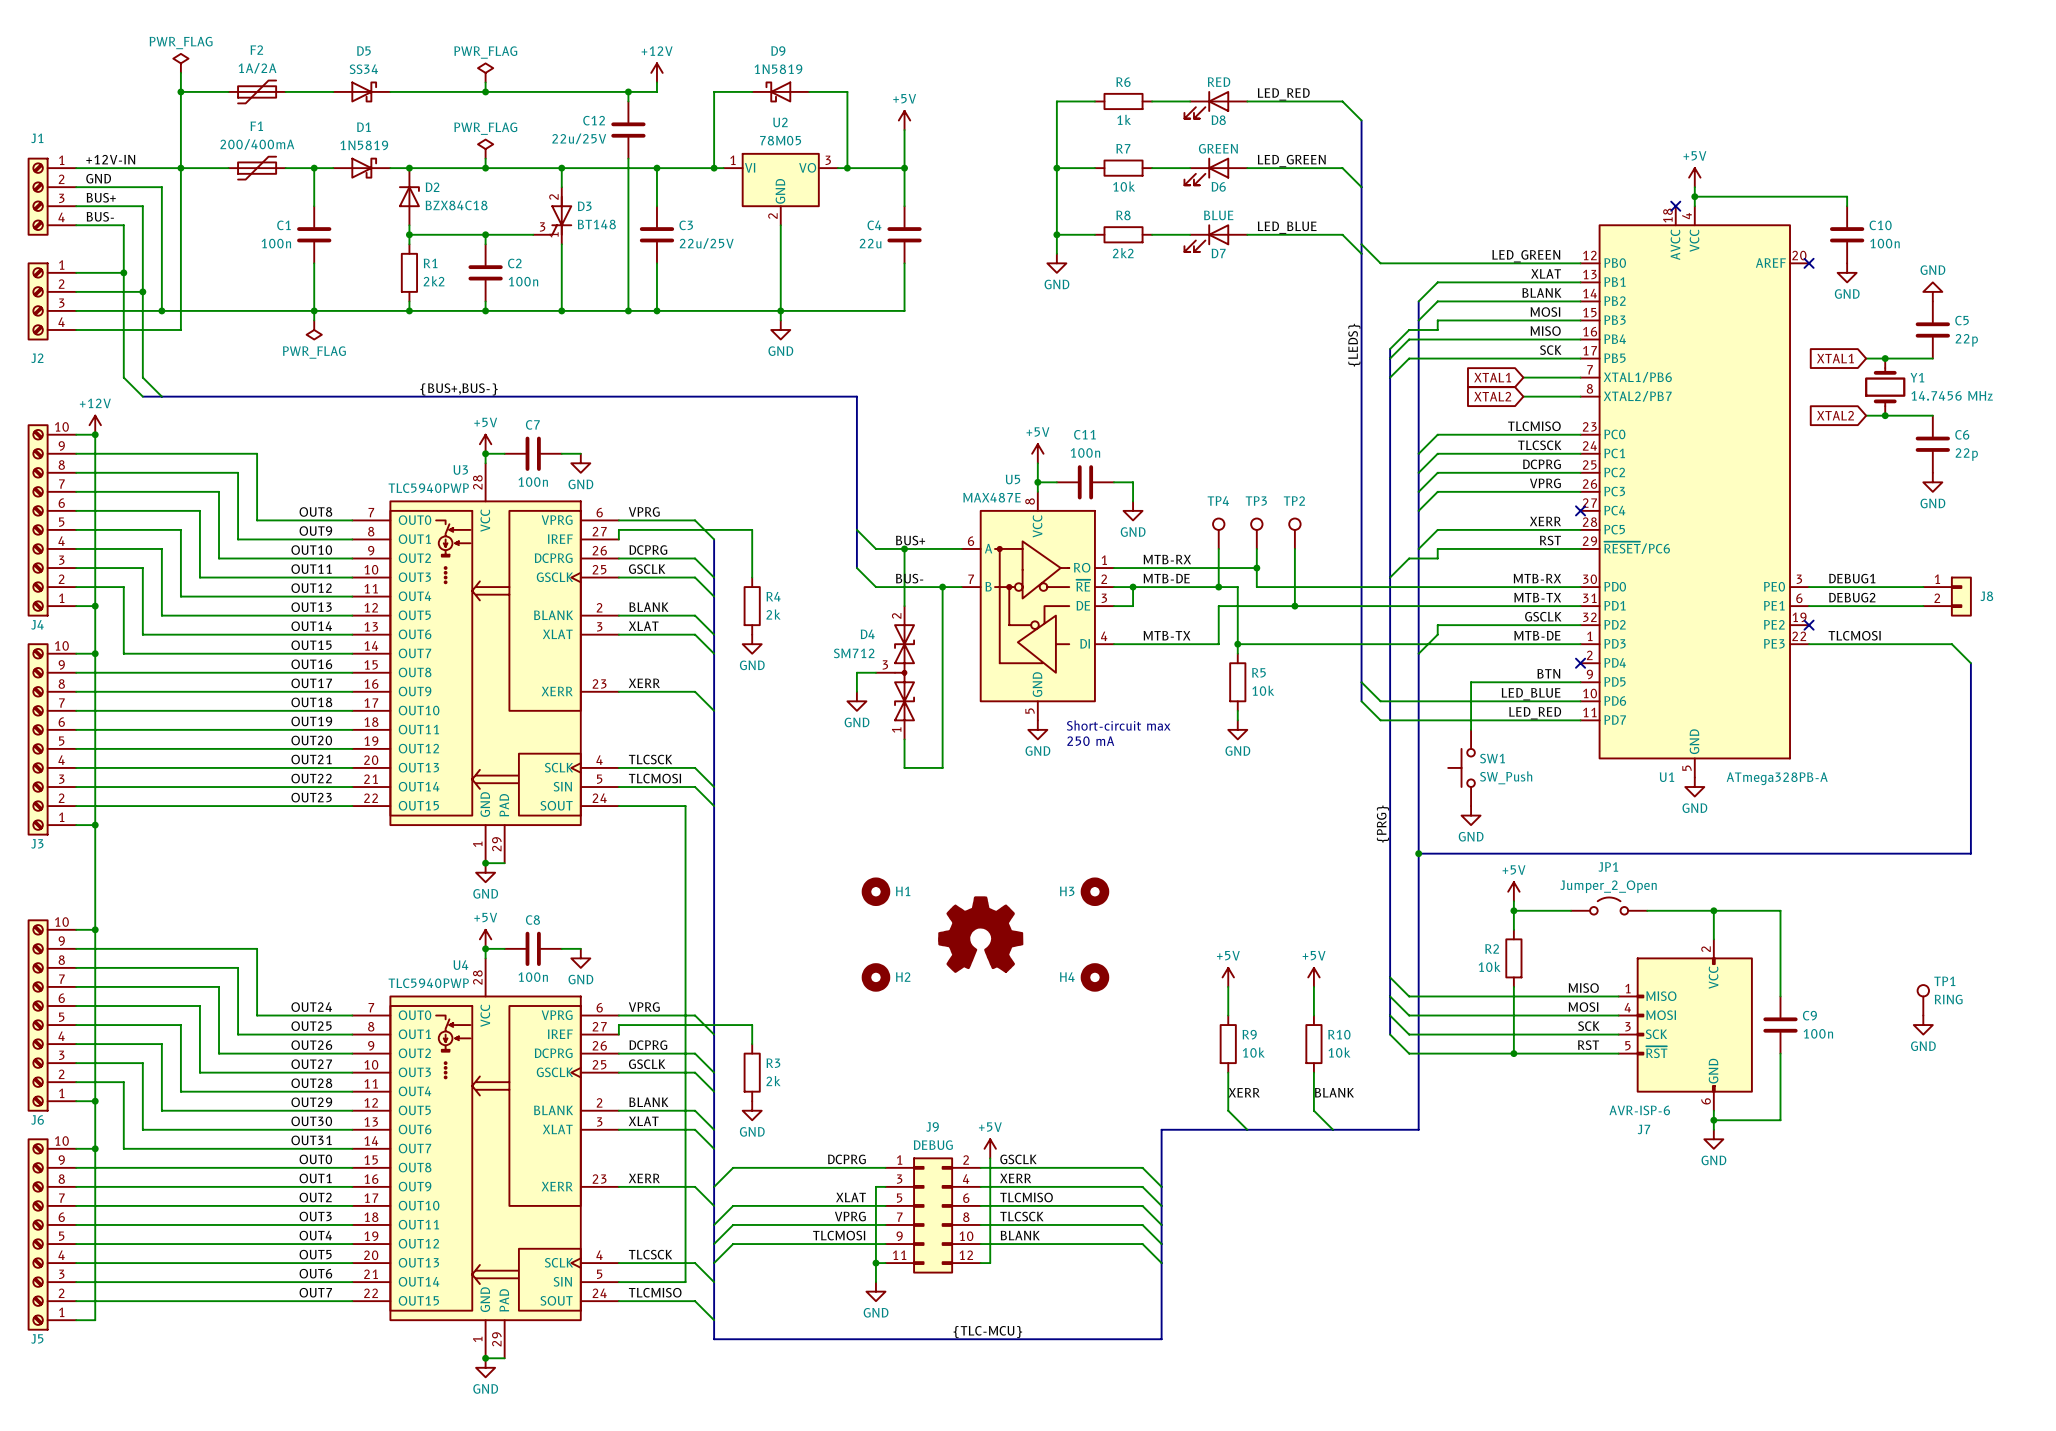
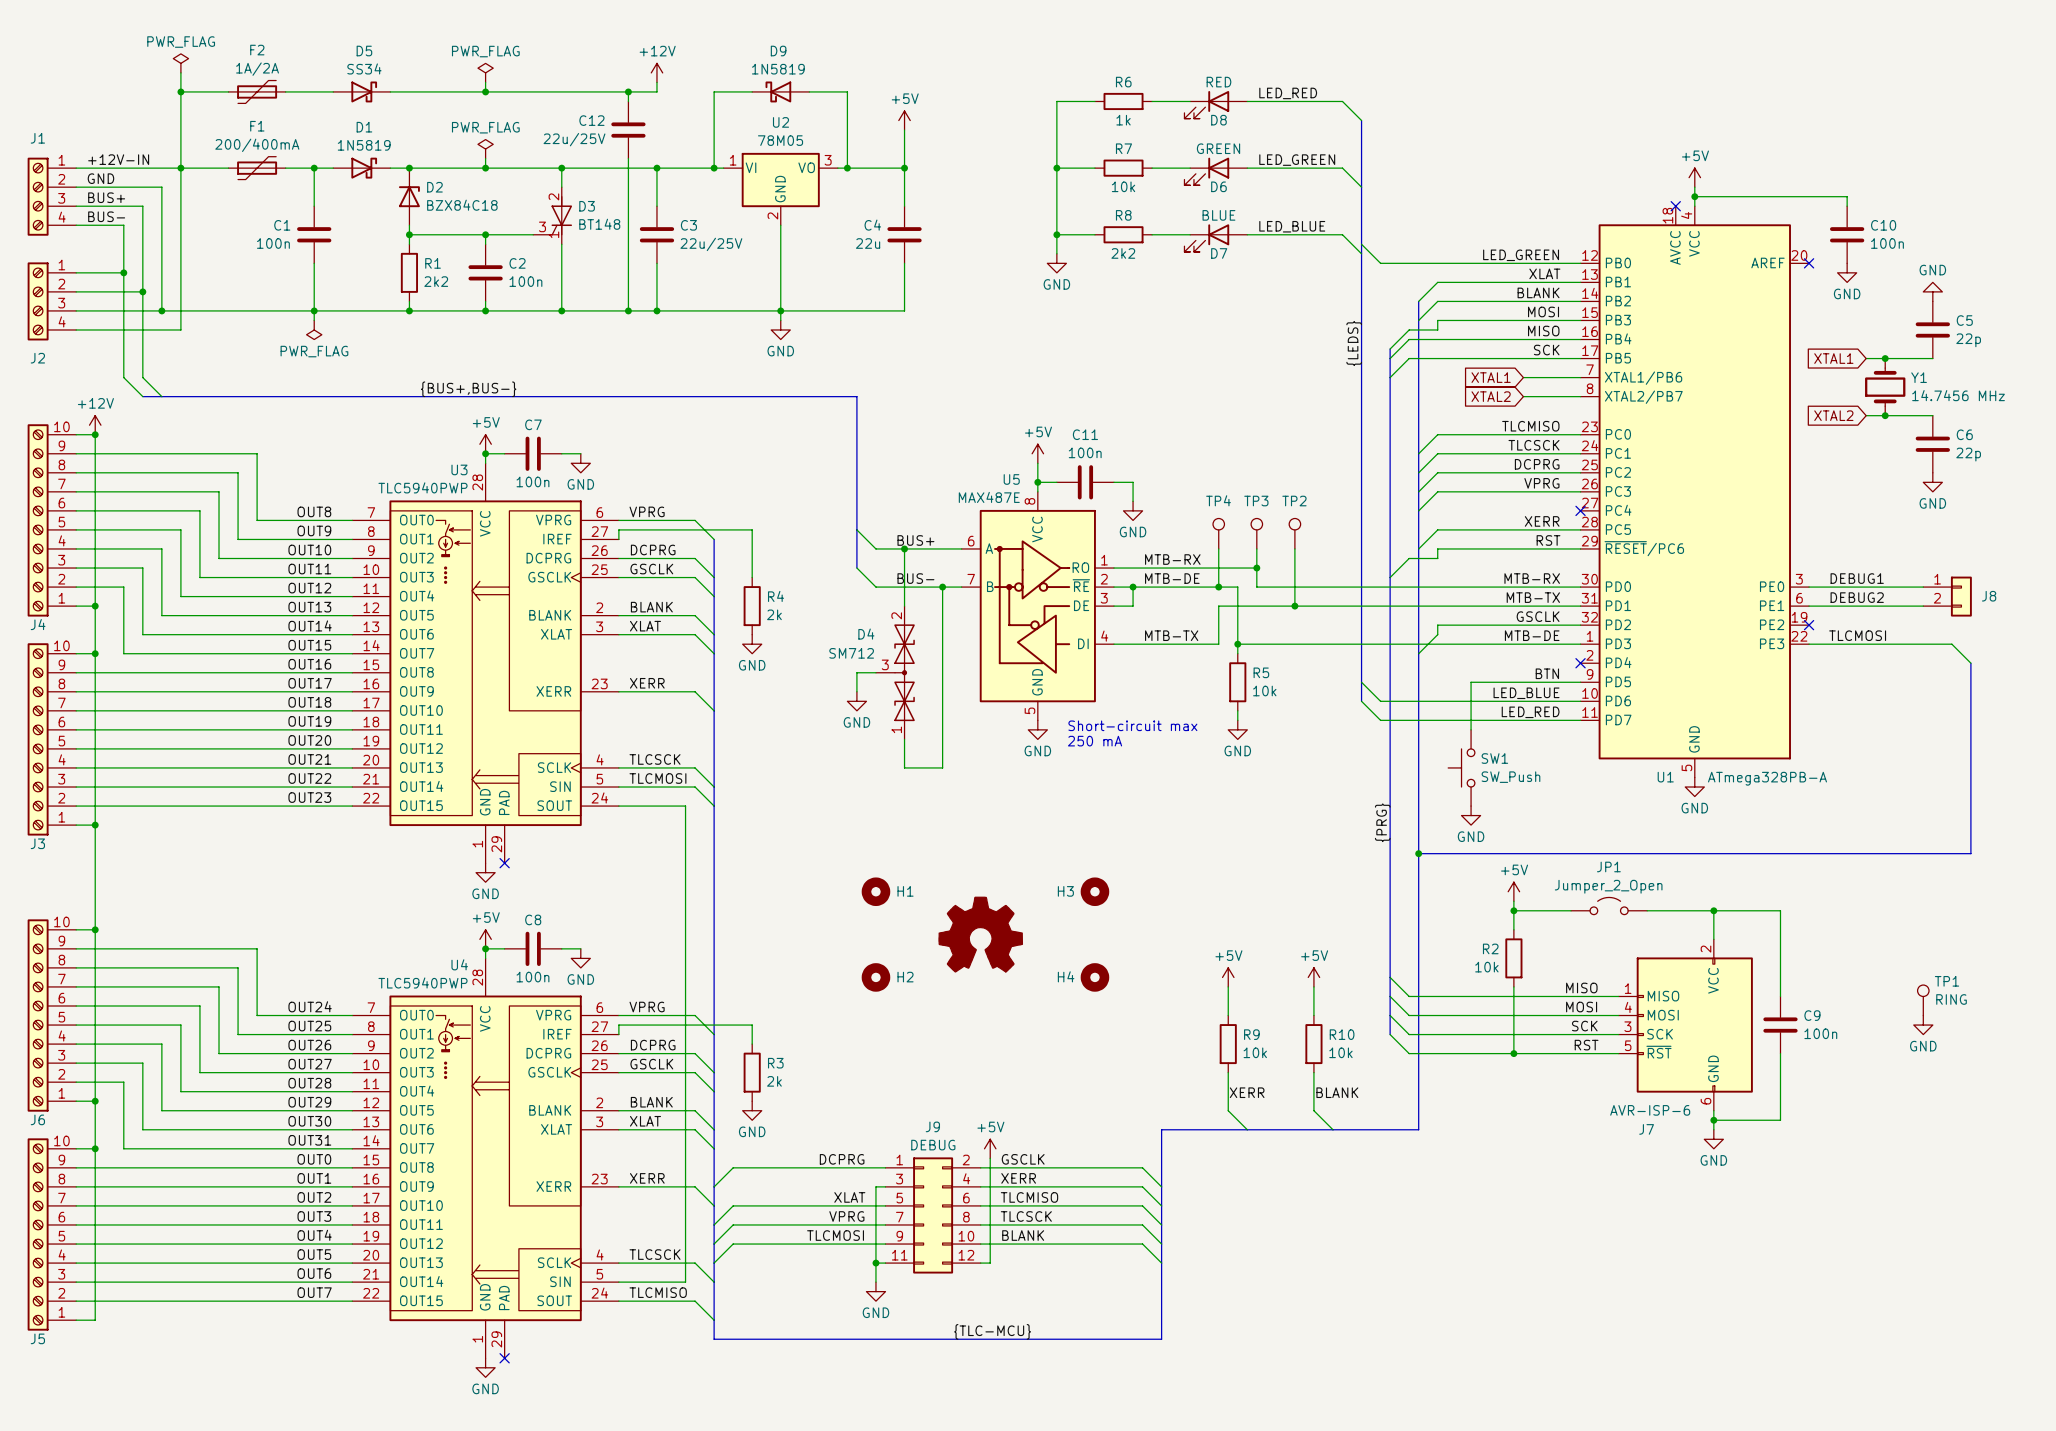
wire: (485, 863) (504, 863) -> none
junction: (485, 863) -> none
no-connect mark: none -> (504, 863)
wire: (485, 1358) (504, 1358) -> none
junction: (485, 1358) -> none
no-connect mark: none -> (504, 1358)

